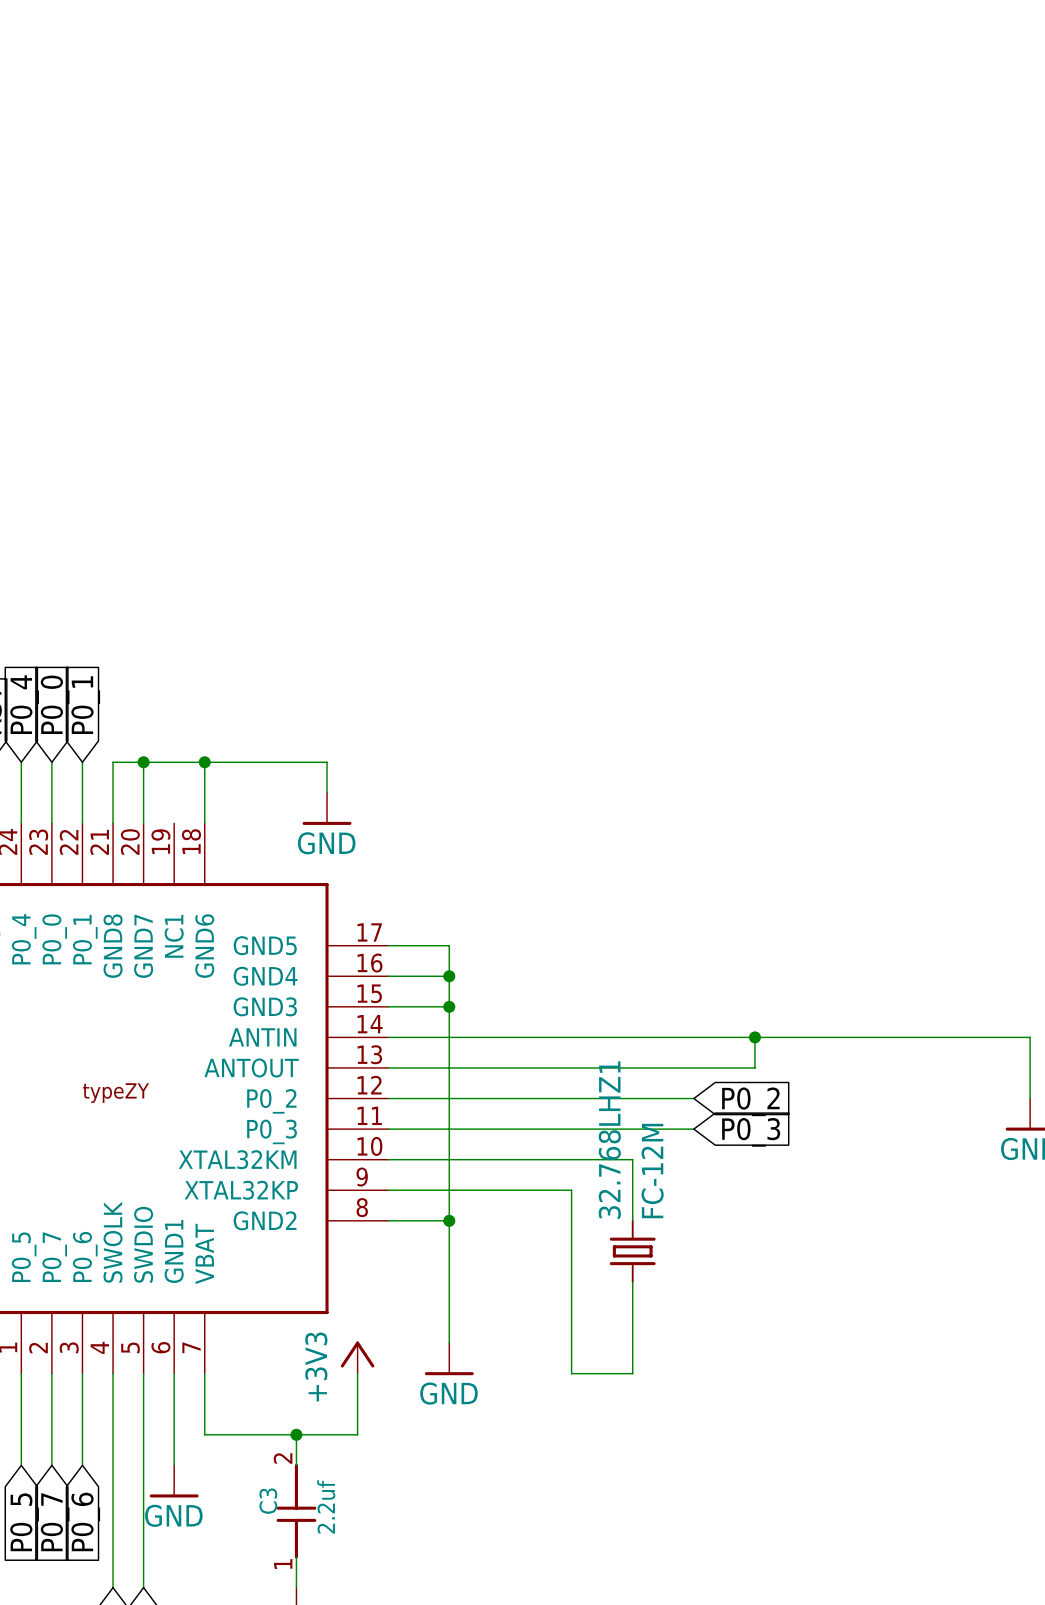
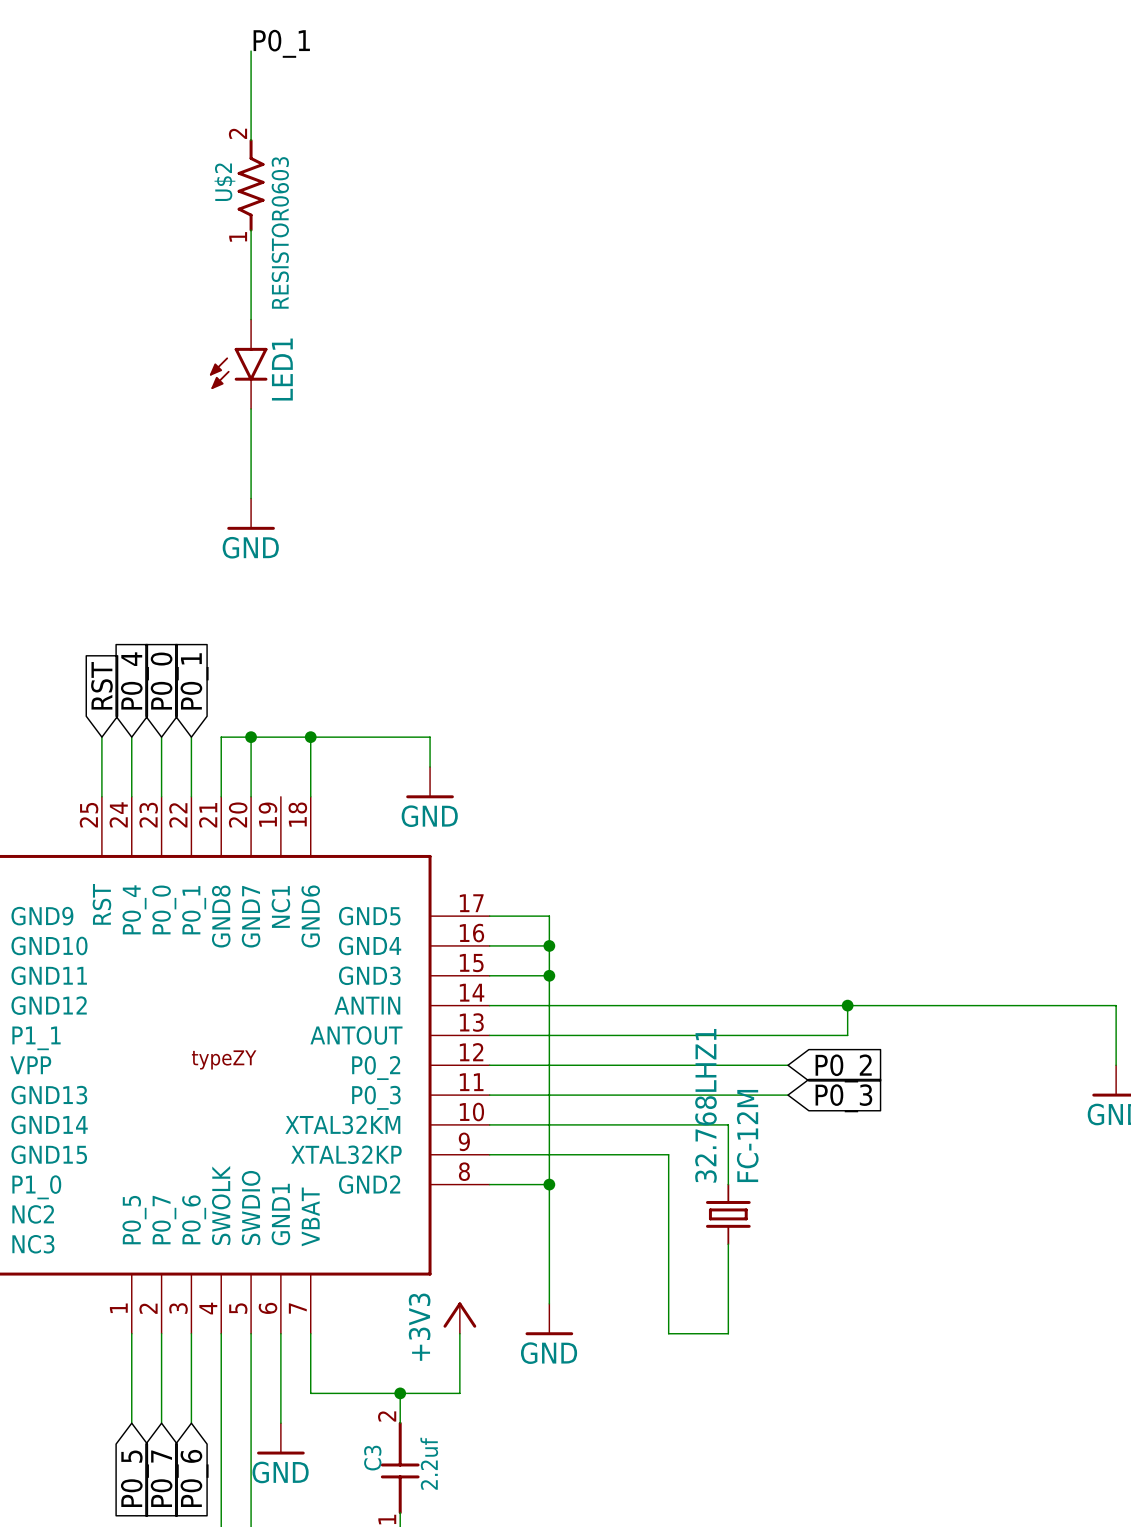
label: none -> P0_1 (281, 43)
wire: none -> (251, 51) (251, 140)
U$2: none -> RESISTOR0603 (251, 185)
wire: none -> (251, 230) (251, 319)
LED1: none -> (238, 364)
wire: none -> (251, 409) (251, 498)
power symbol: none -> GND (251, 514)

